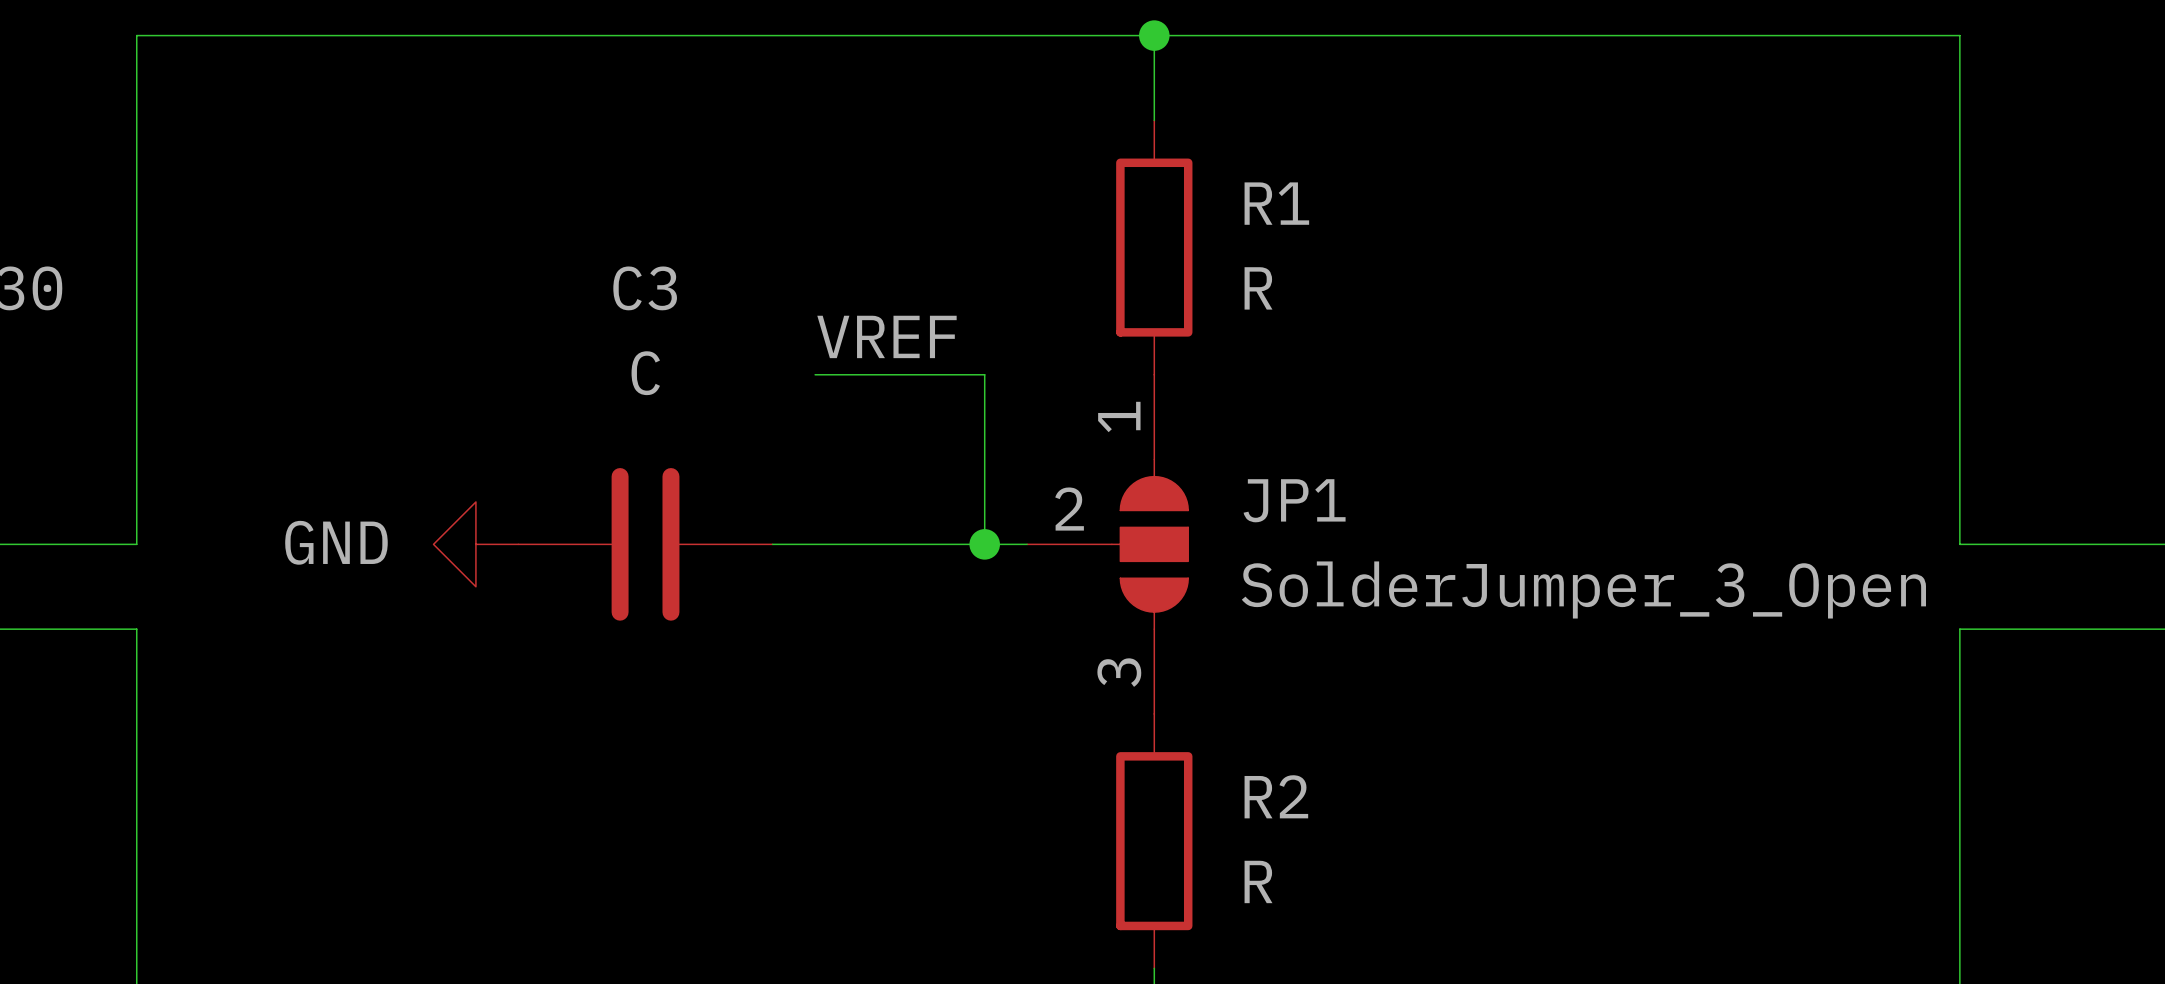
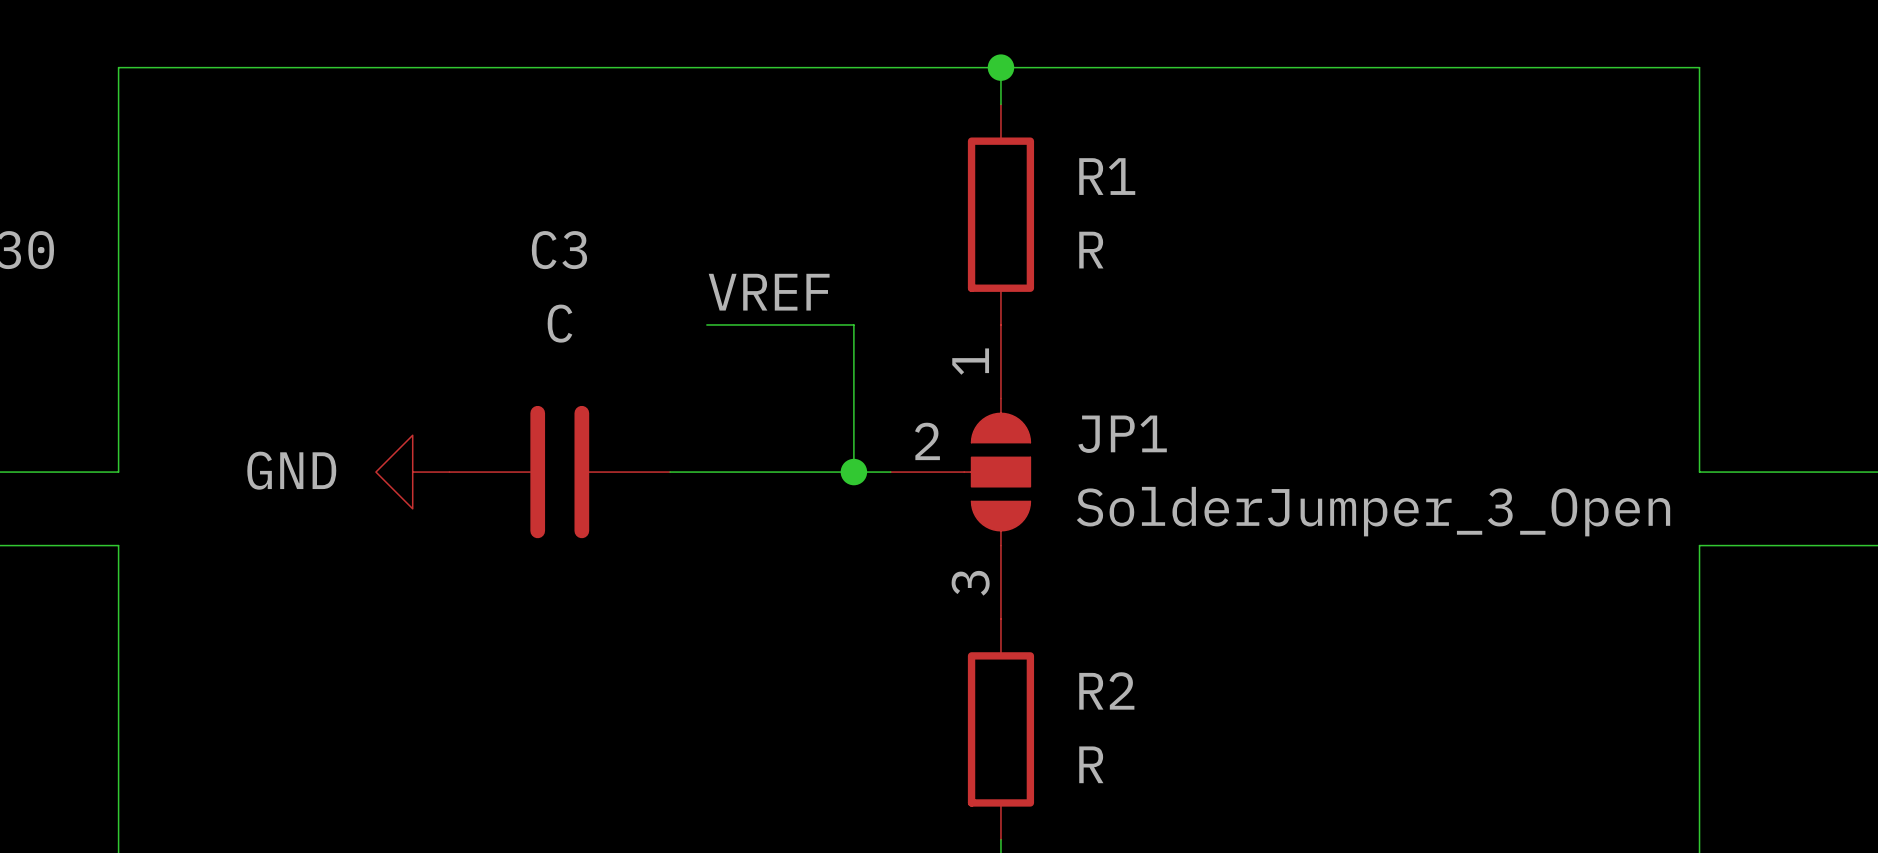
wire: (1154, 35) (1154, 77) -> none
junction position: (1154, 35) -> (1000, 67)
wire: (136, 77) (136, 35) (1959, 35) (1959, 77) -> (118, 67) (1699, 67)

